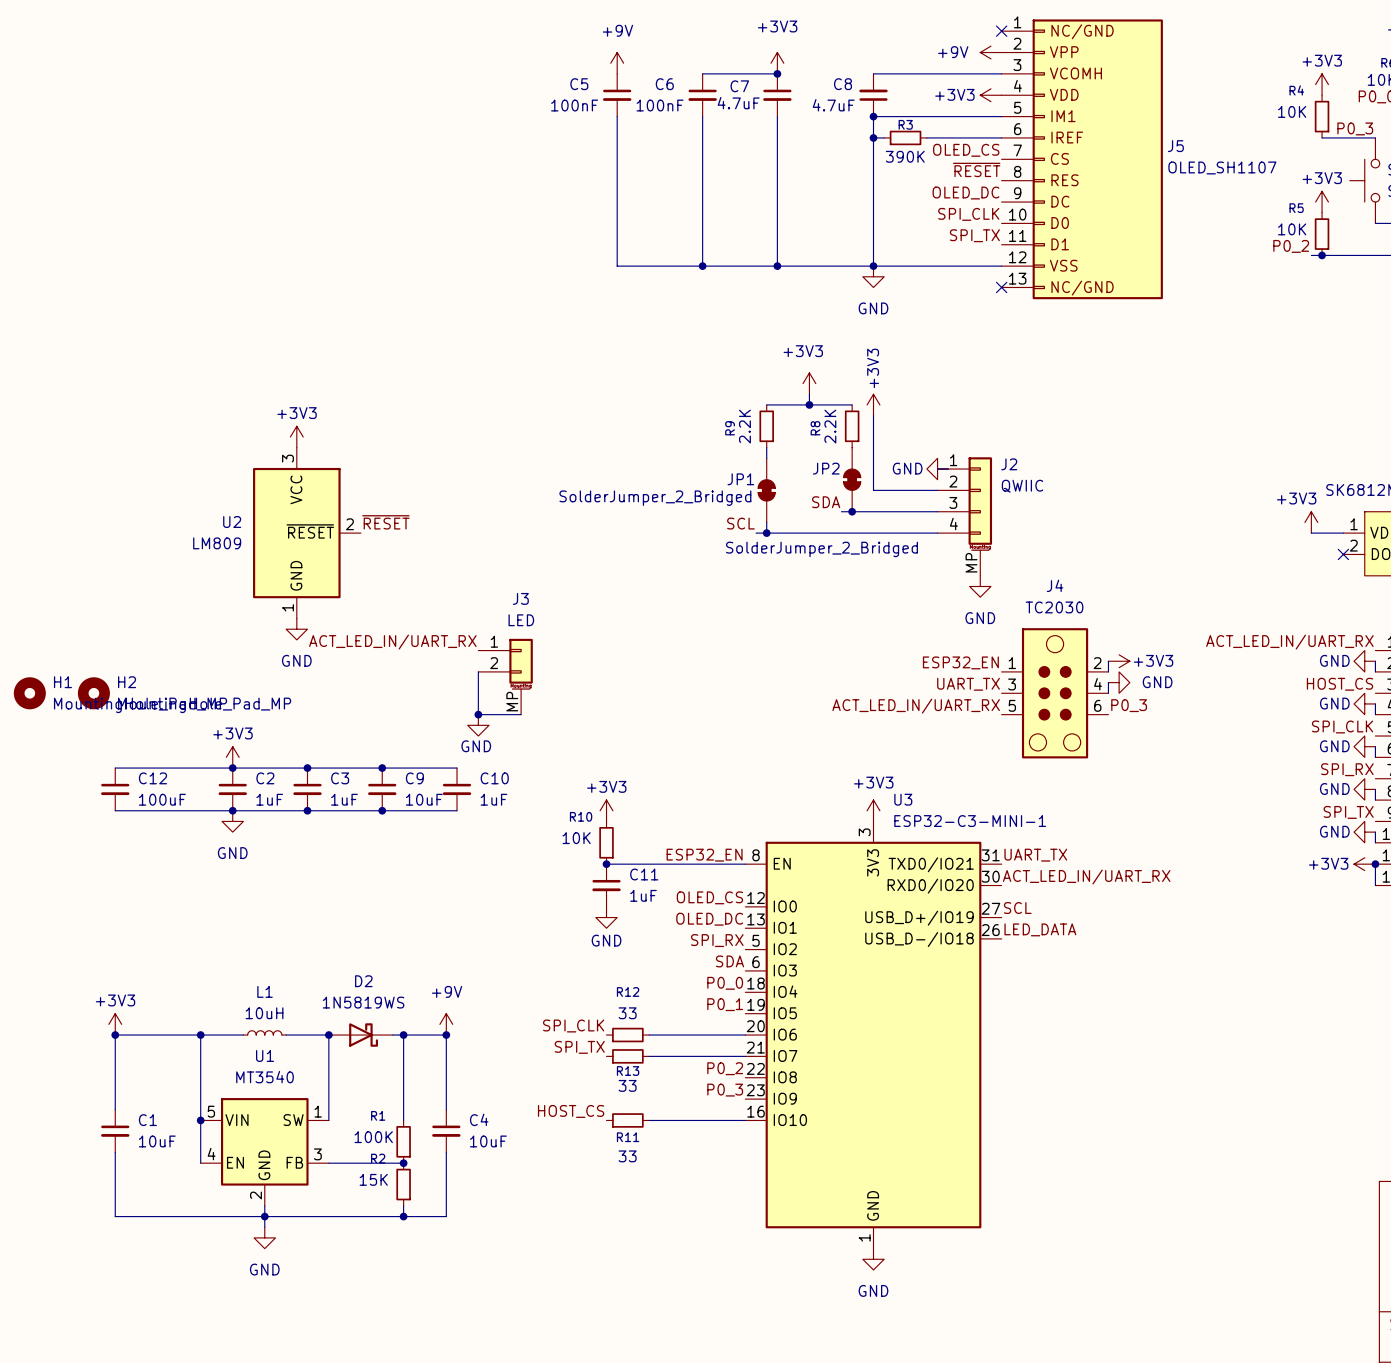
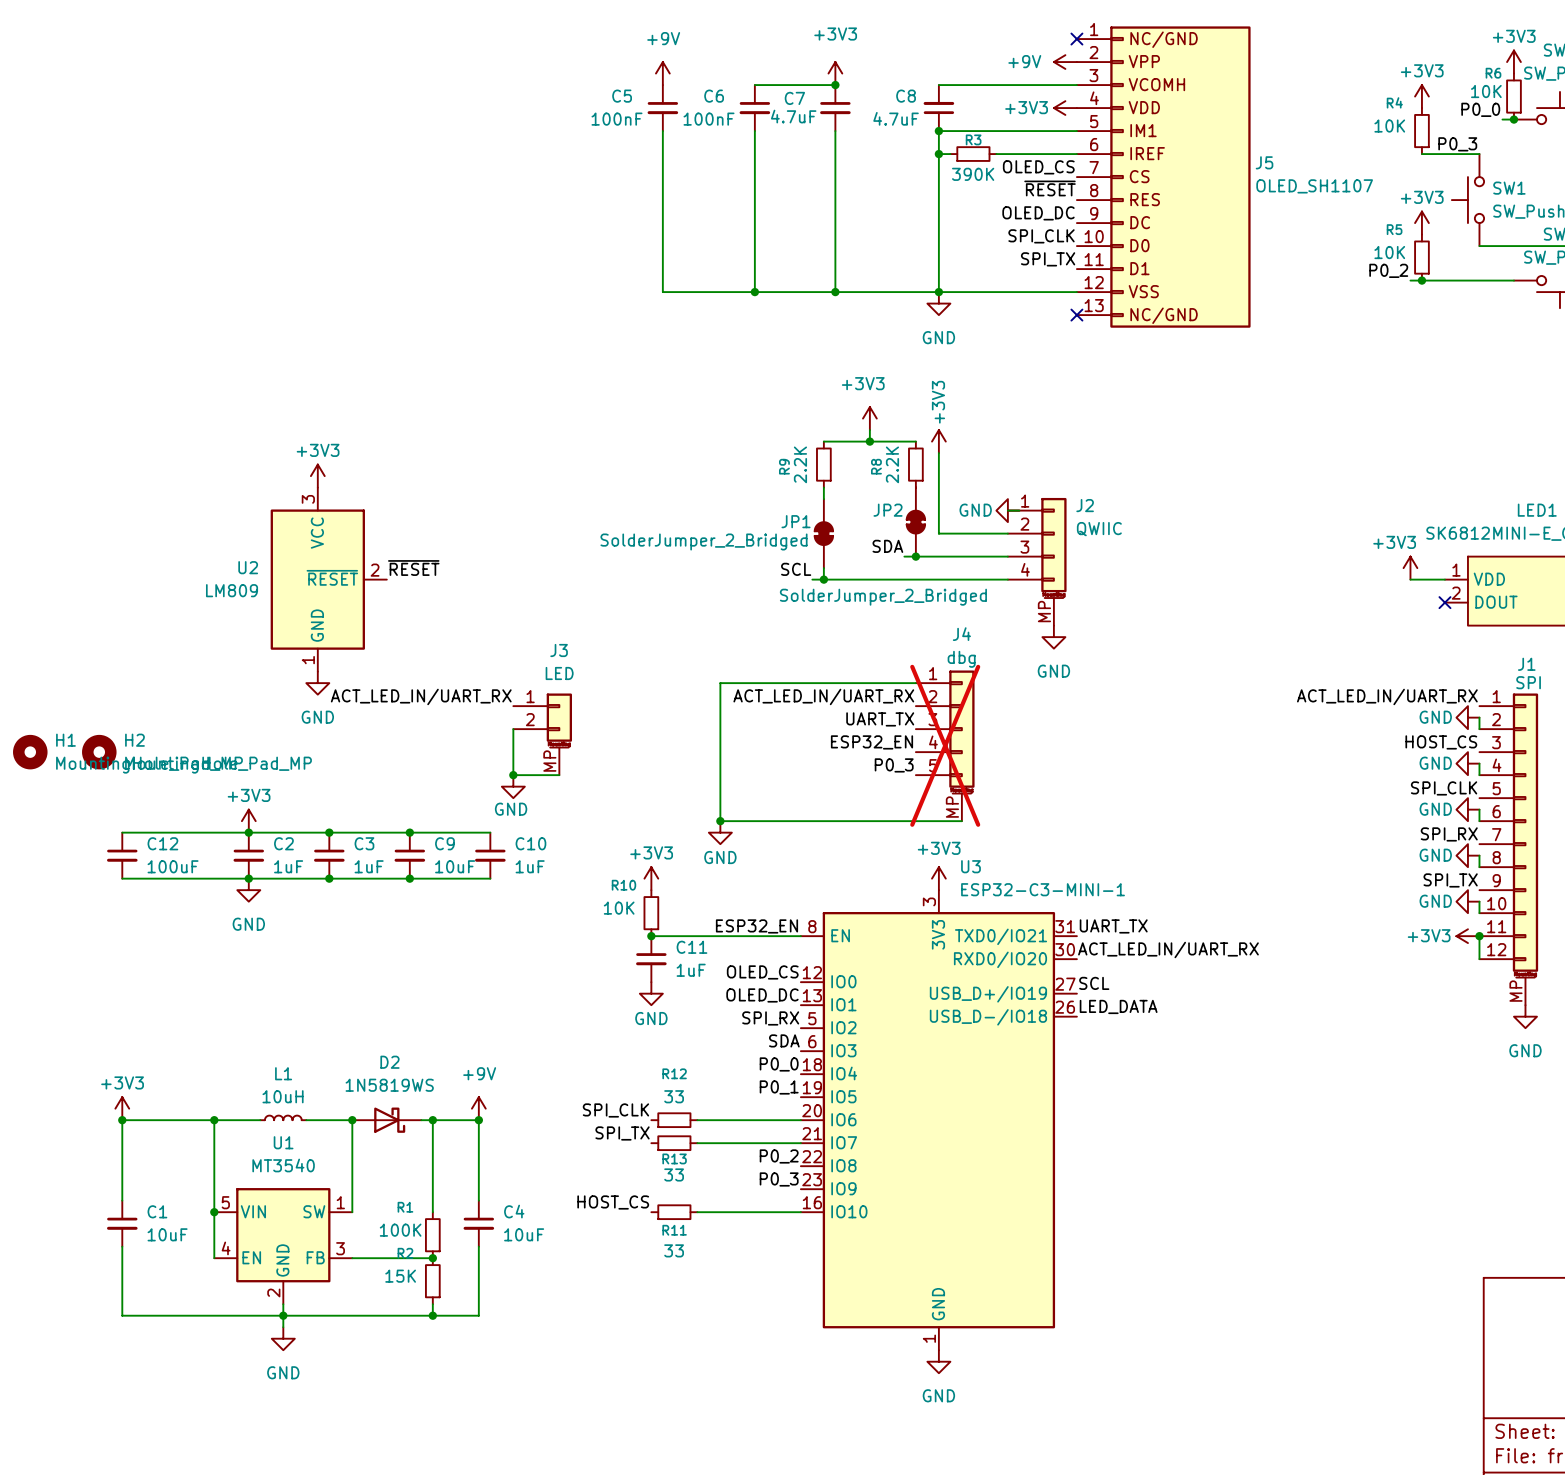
J4 value: TC2030 (1054, 607) -> dbg (961, 659)
J4 symbol: [1001, 628, 1109, 759] -> [915, 670, 975, 822]
wire: none -> (915, 683) (720, 683) (720, 821) (961, 821)
wire: (1108, 661) (1108, 671) -> none
power symbol: +3V3 (1119, 661) -> none
label position: ESP32_EN (960, 662) -> ESP32_EN (871, 742)
wire: (1108, 682) (1108, 693) -> none
power symbol: GND (1119, 682) -> none
label position: UART_TX (968, 684) -> UART_TX (880, 719)
J4 do-not-place cross: none -> (945, 745)
label: none -> P0_3 (894, 765)
label: P0_3 (1129, 705) -> none
label position: ACT_LED_IN/UART_RX (916, 706) -> ACT_LED_IN/UART_RX (823, 696)
junction: none -> (720, 821)
power symbol: none -> GND (720, 832)

